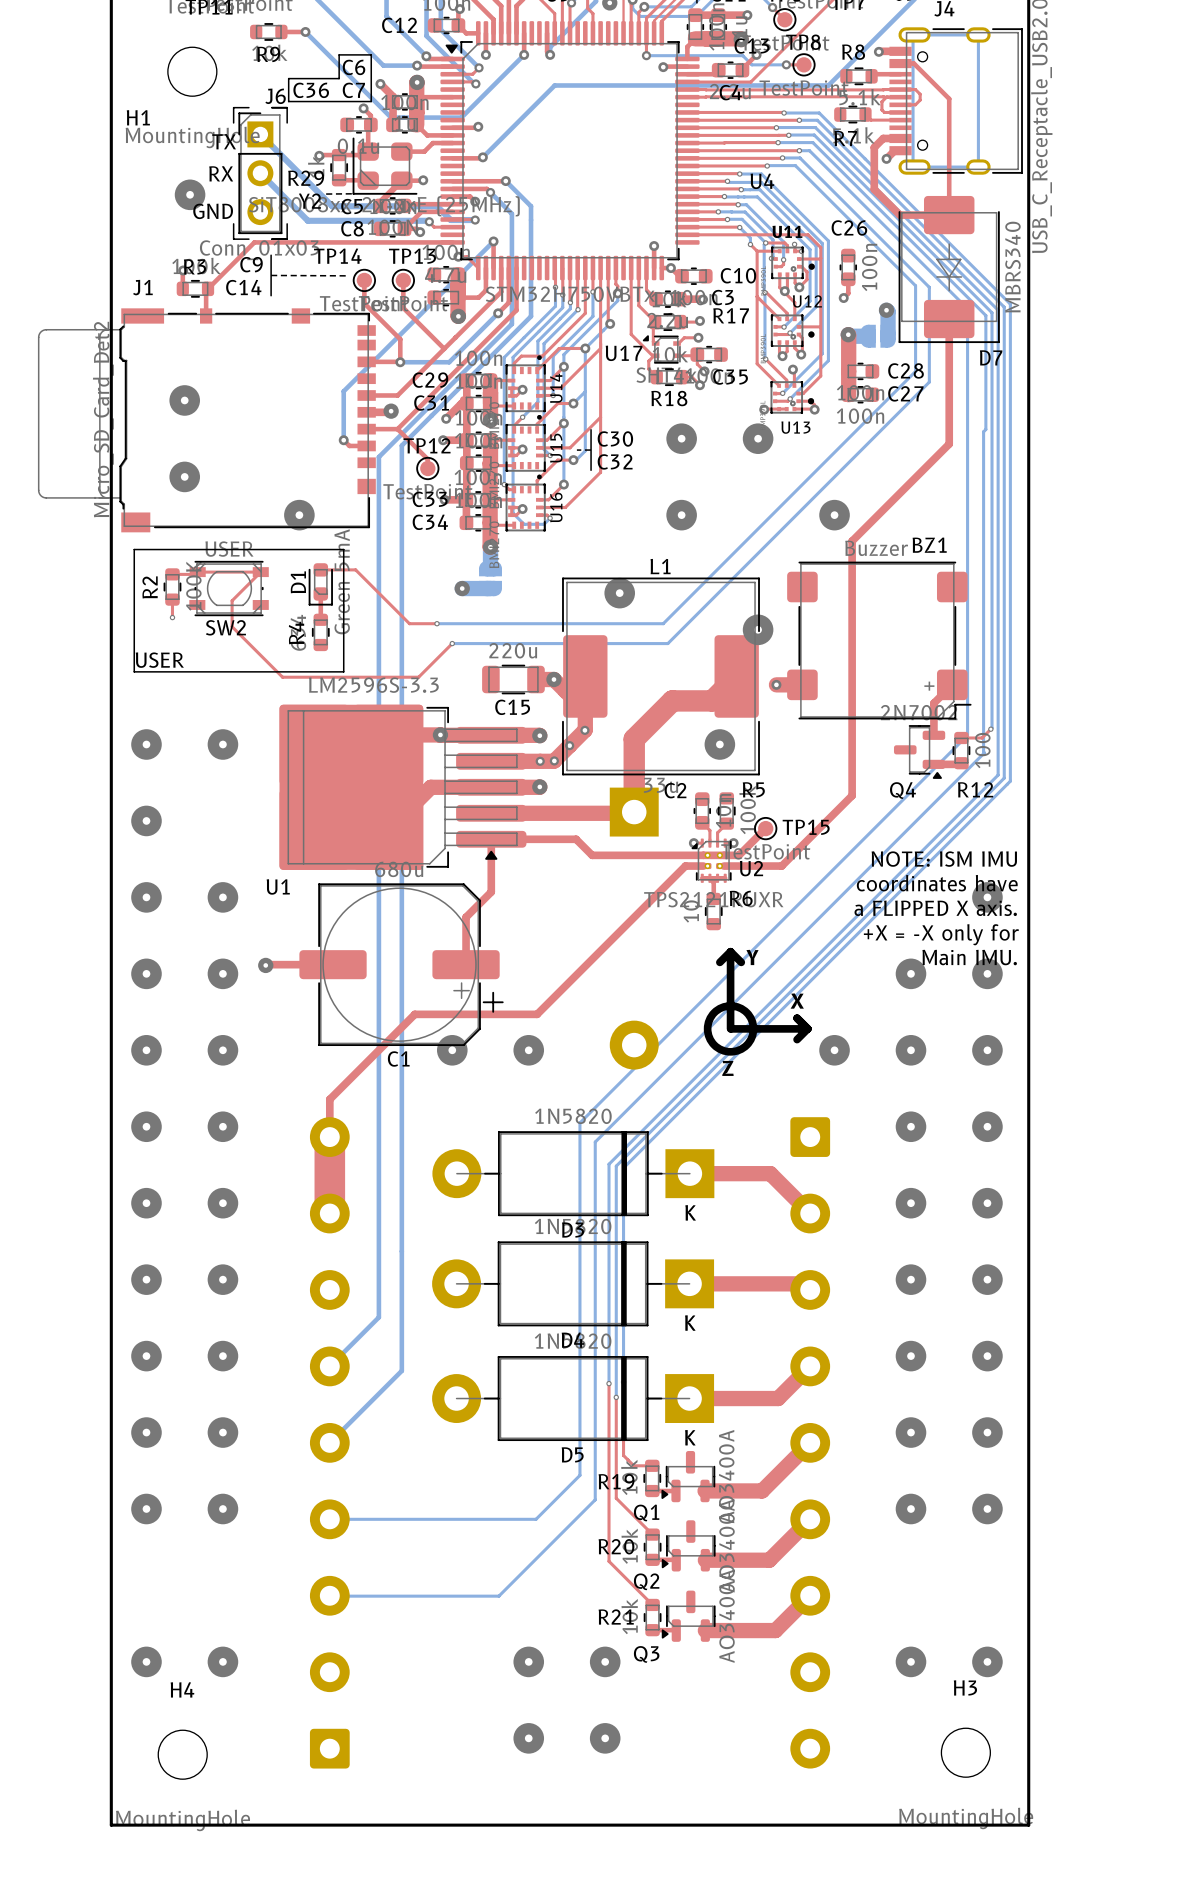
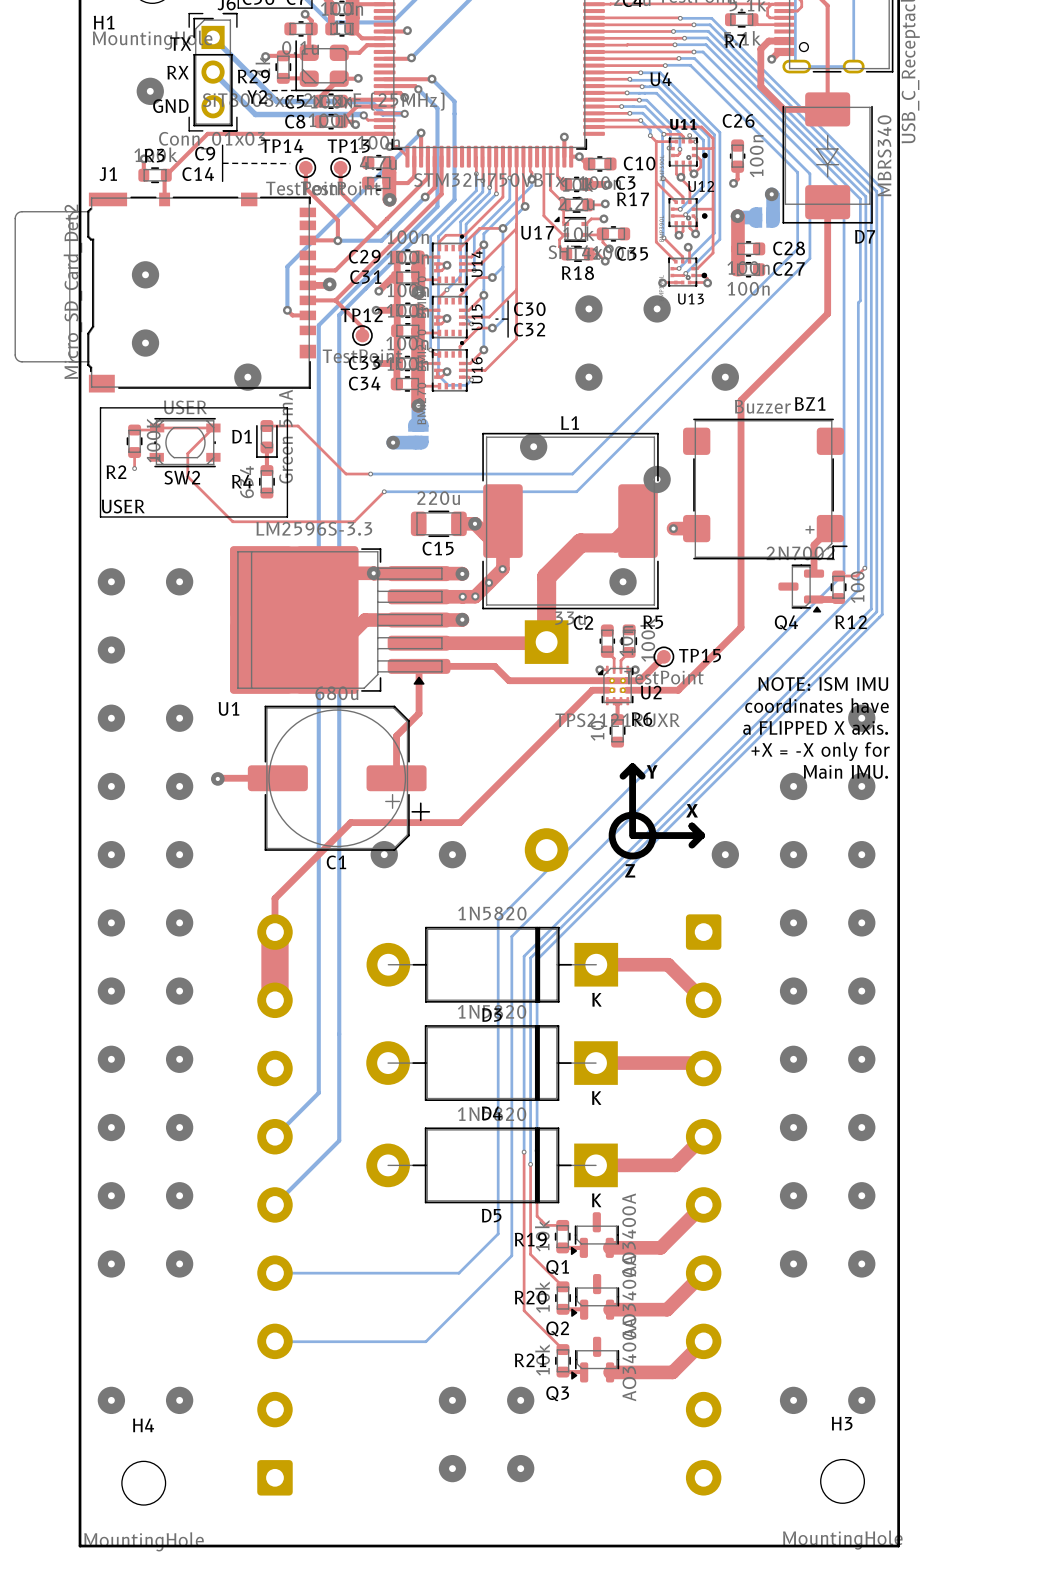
D1 name rotation: 0° (298, 582) -> 90° clockwise (242, 436)
R2 name rotation: 0° (150, 587) -> 90° clockwise (116, 472)
R4 name rotation: 0° (296, 633) -> 90° clockwise (242, 481)

